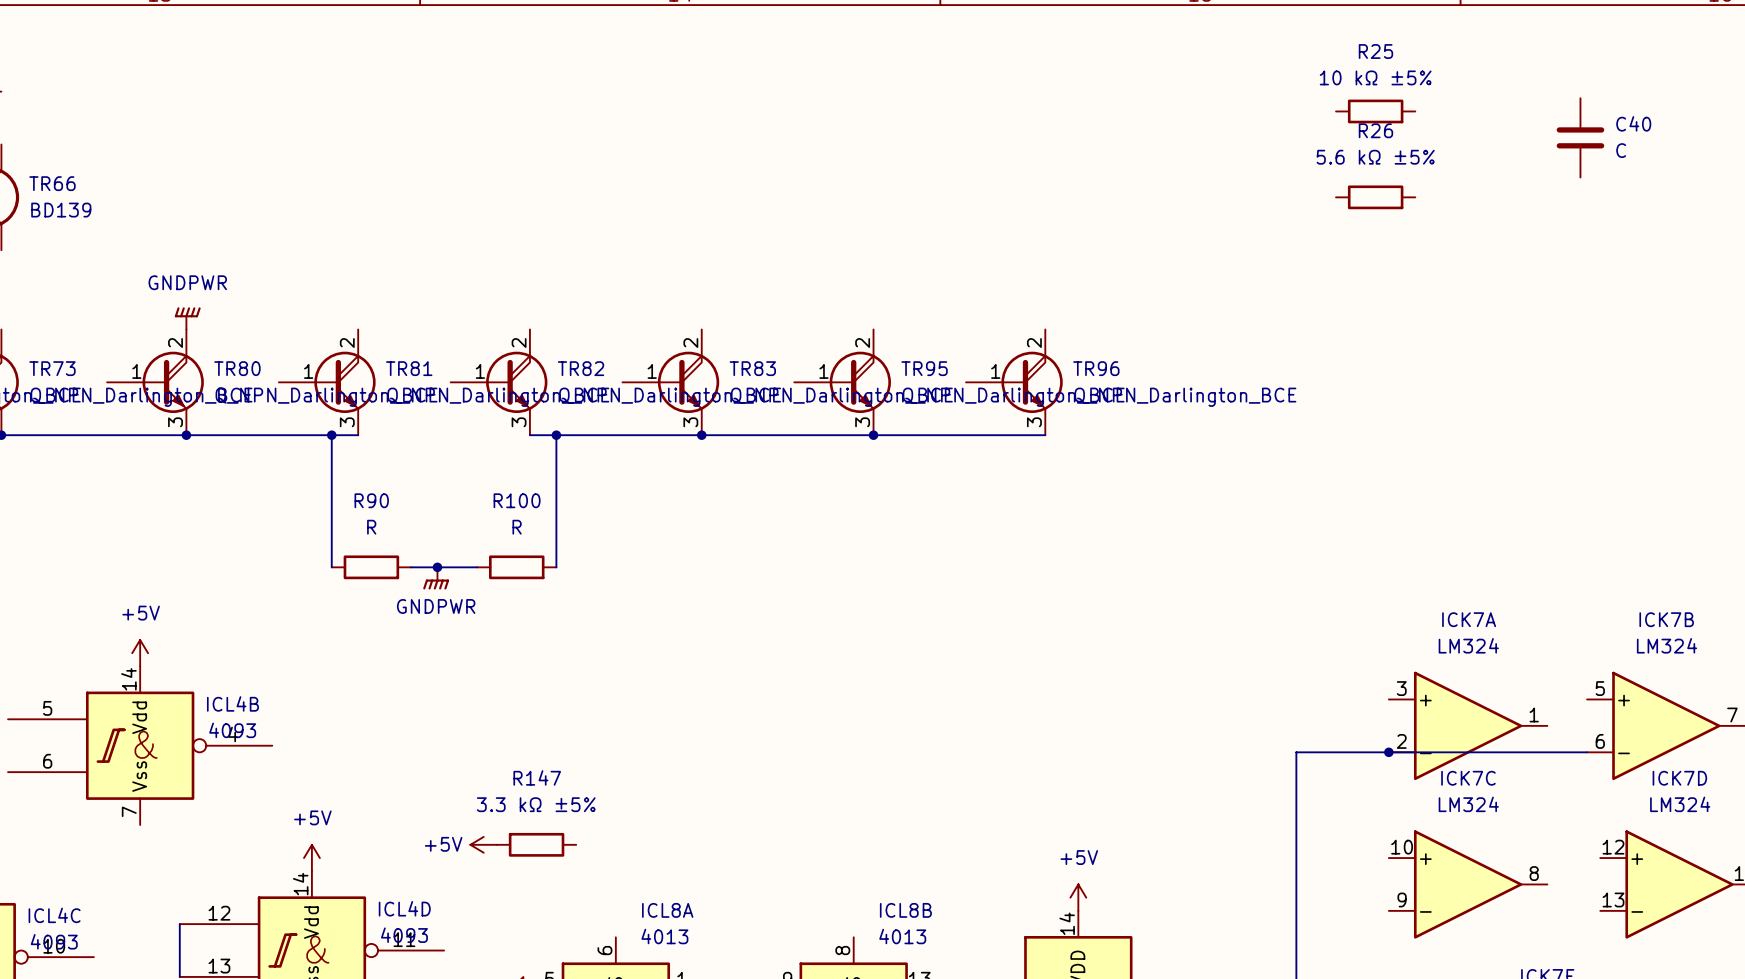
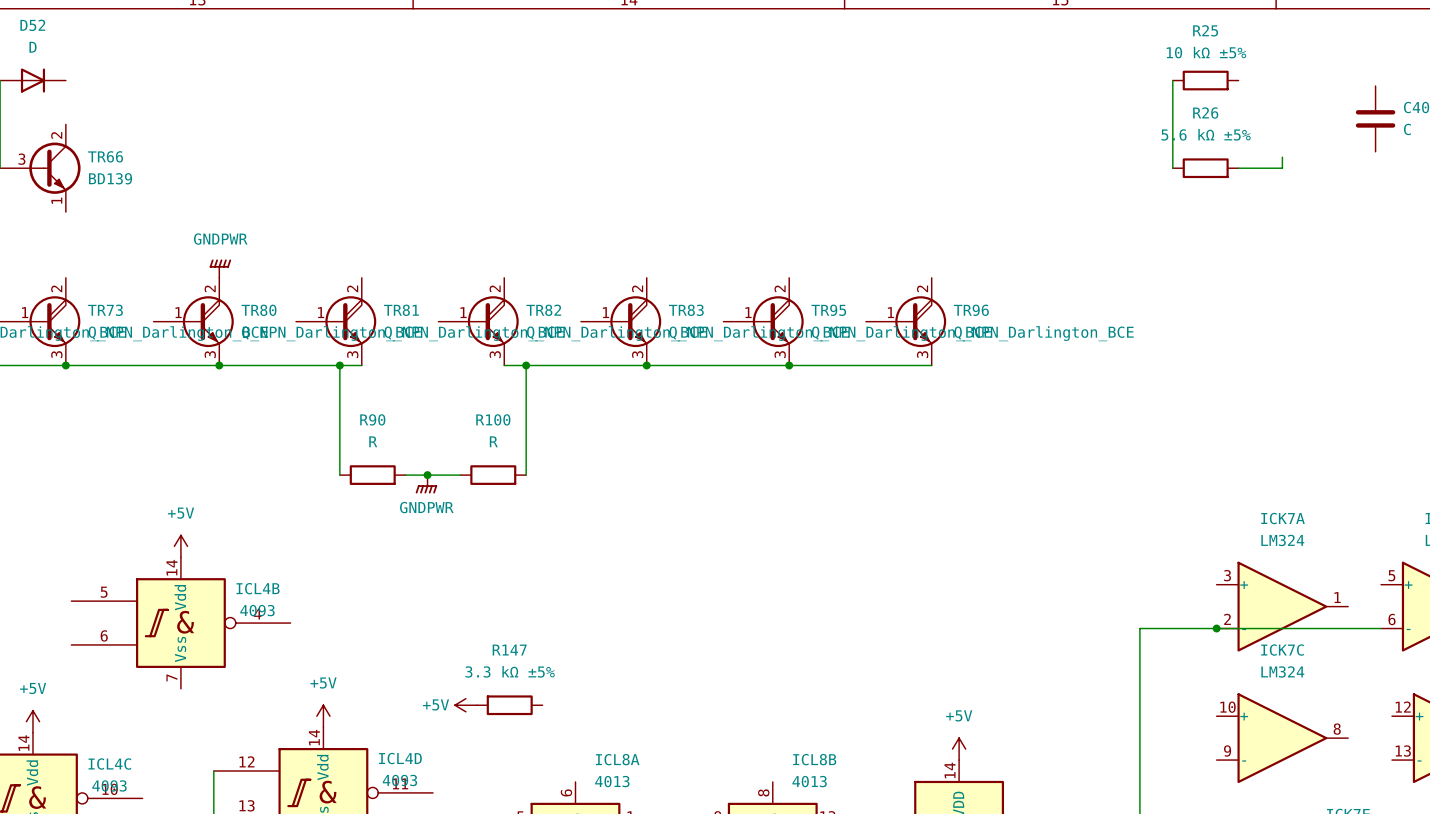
wire: none -> (1172, 80) (1172, 168)
R25 position: (1375, 111) -> (1205, 80)
wire: none -> (1282, 157) (1282, 168) (1238, 168)

